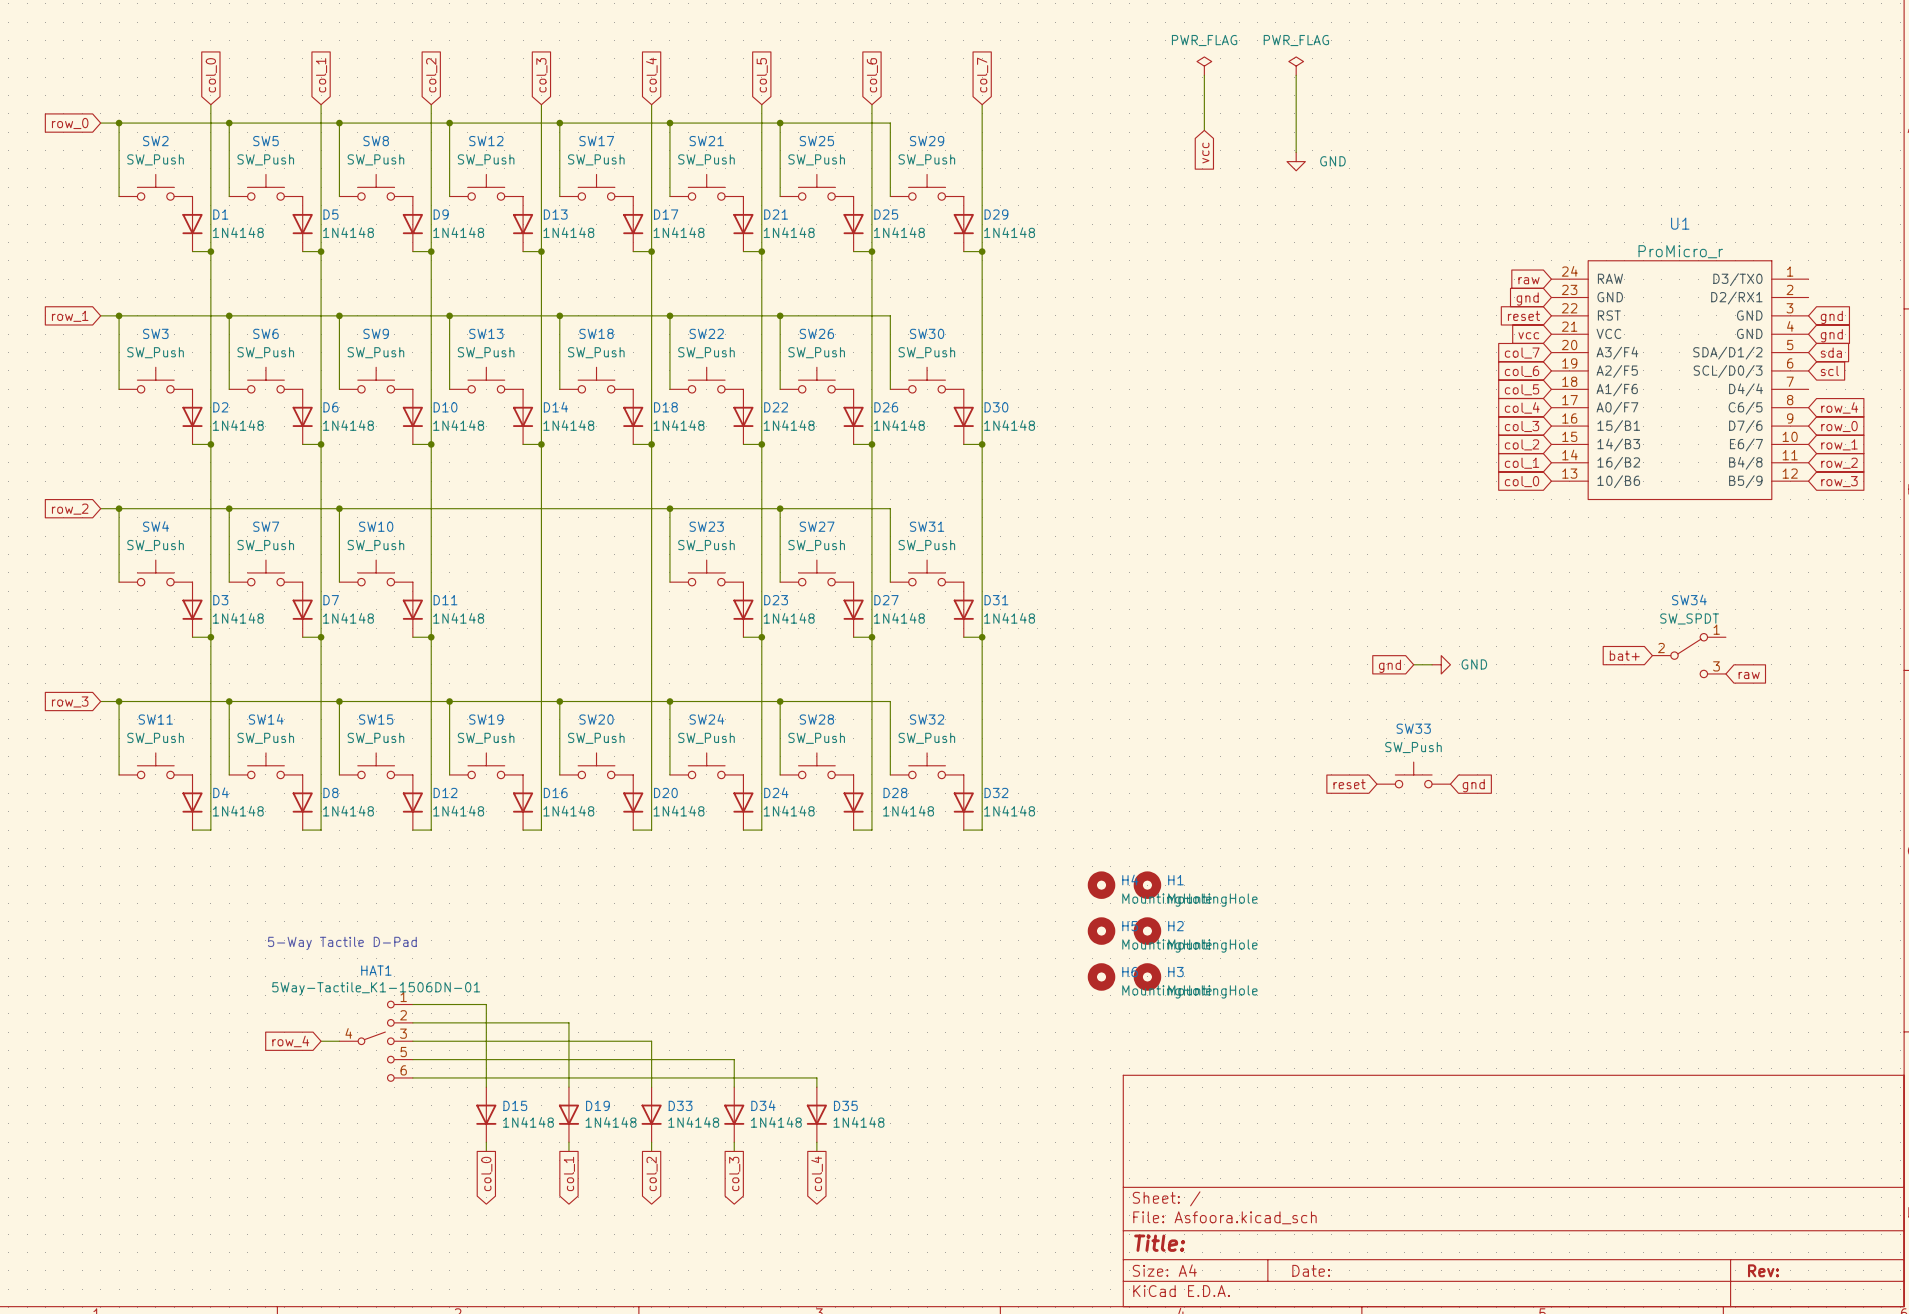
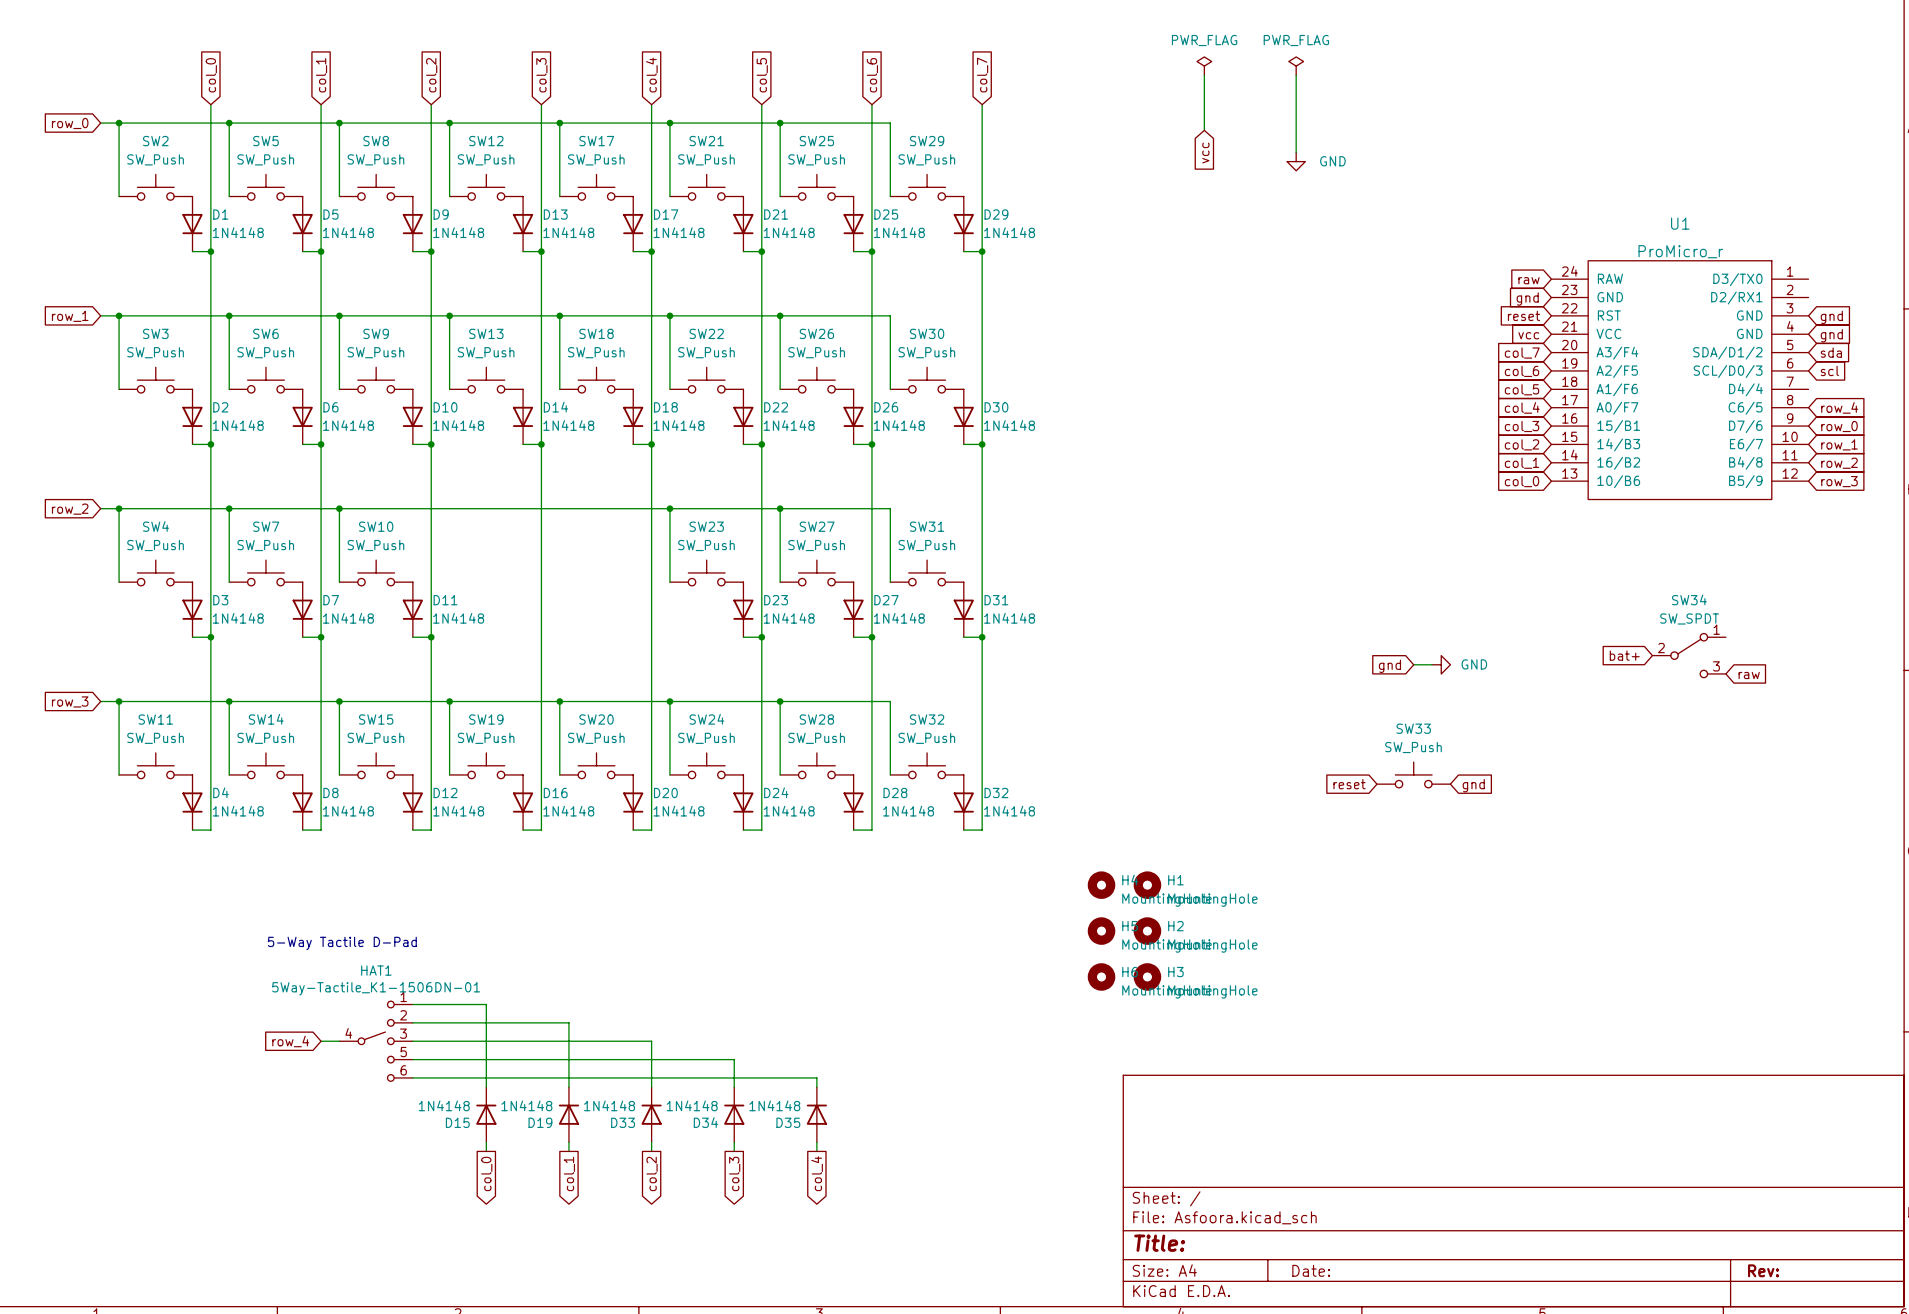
D15 rotation: 0° (486, 1114) -> 180° (486, 1114)
D19 rotation: 0° (568, 1114) -> 180° (568, 1114)
D33 rotation: 0° (651, 1114) -> 180° (651, 1114)
D34 rotation: 0° (734, 1114) -> 180° (734, 1114)
D35 rotation: 0° (816, 1114) -> 180° (816, 1114)

